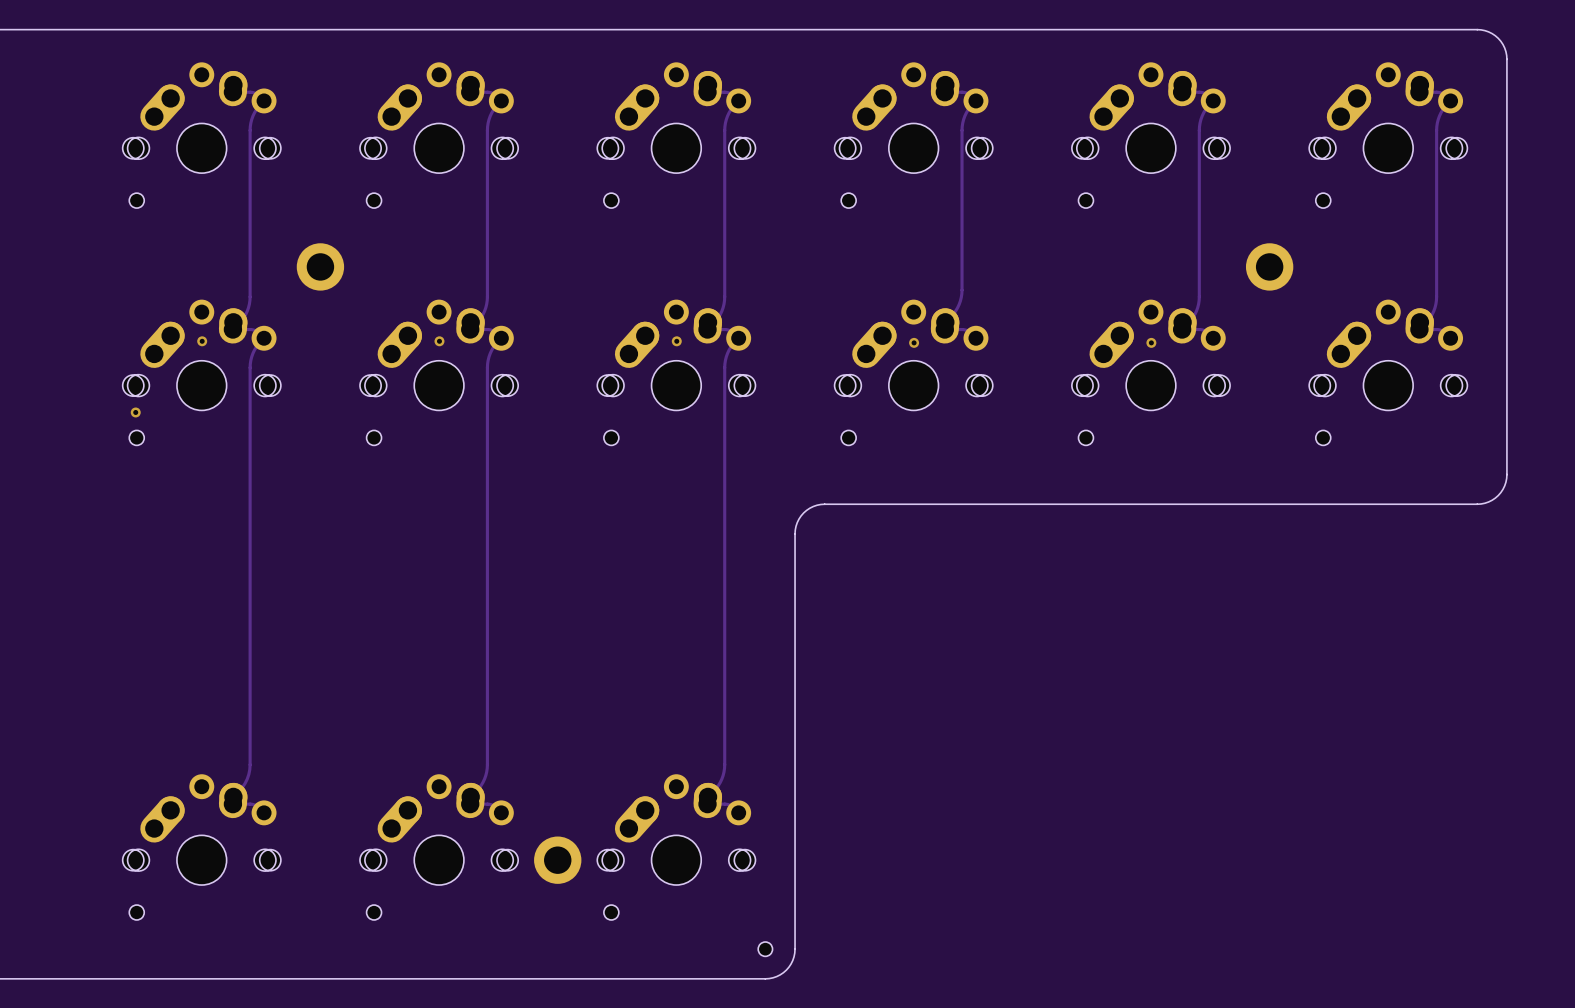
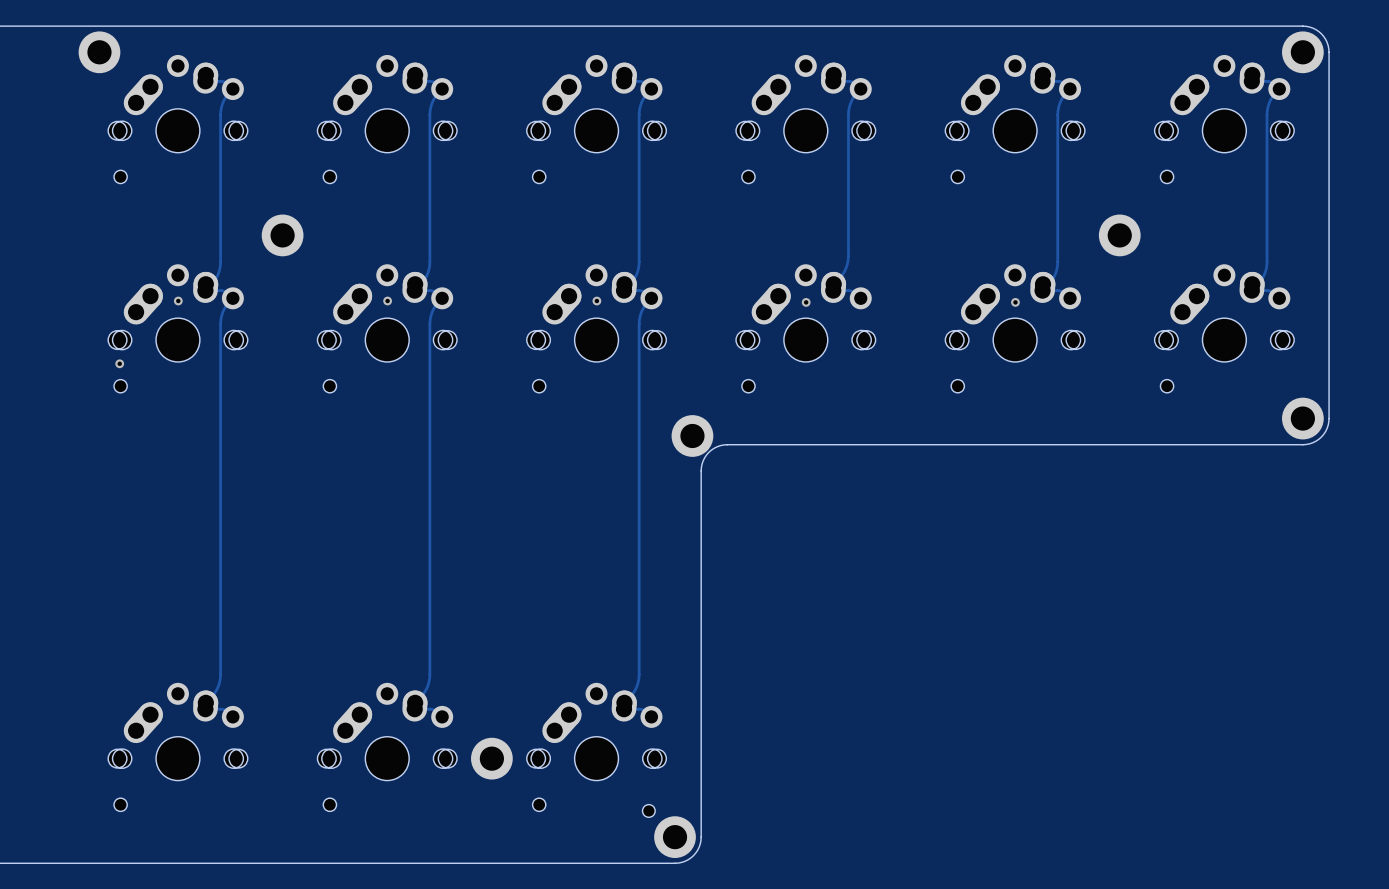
part: none -> (99, 52)
part: none -> (1302, 52)
part: none -> (1302, 418)
part: none -> (692, 435)
part: none -> (648, 810)
part footprint: [758, 942, 773, 957] -> [654, 816, 696, 859]

